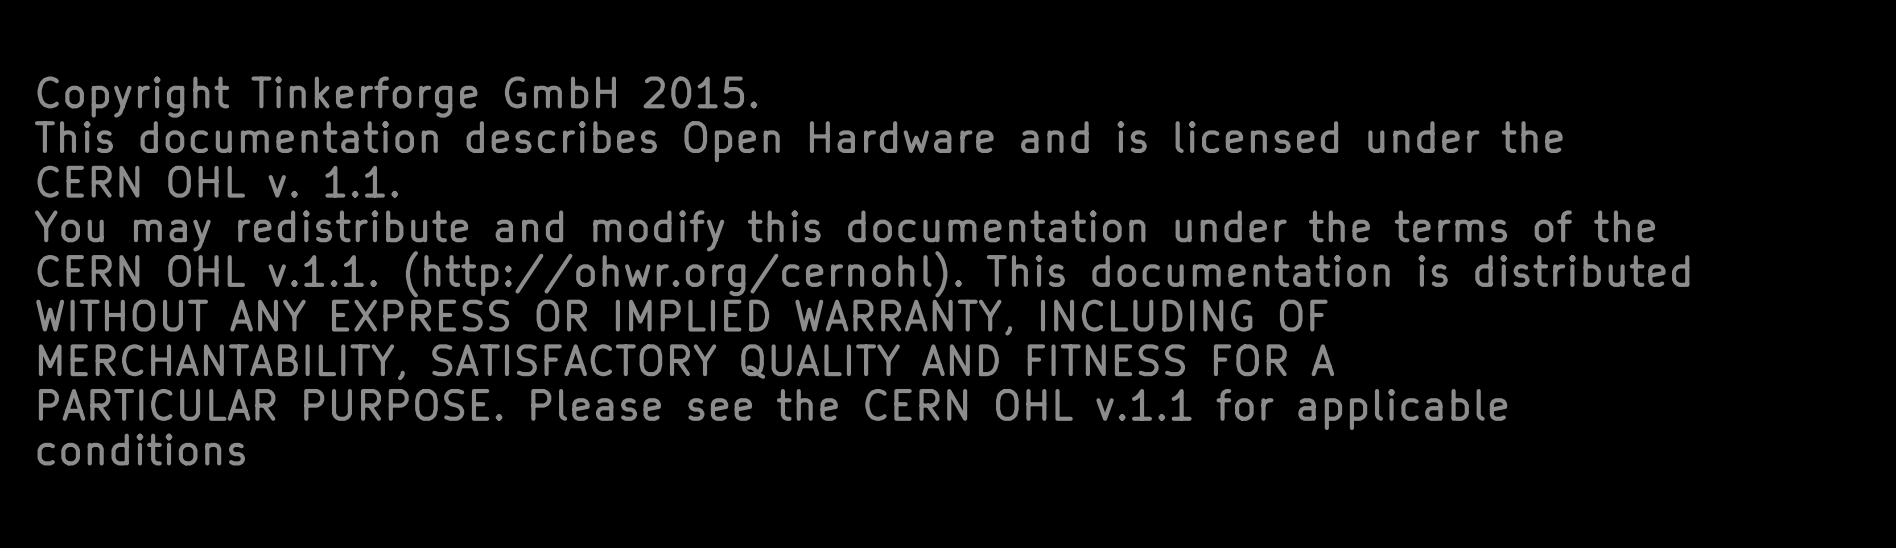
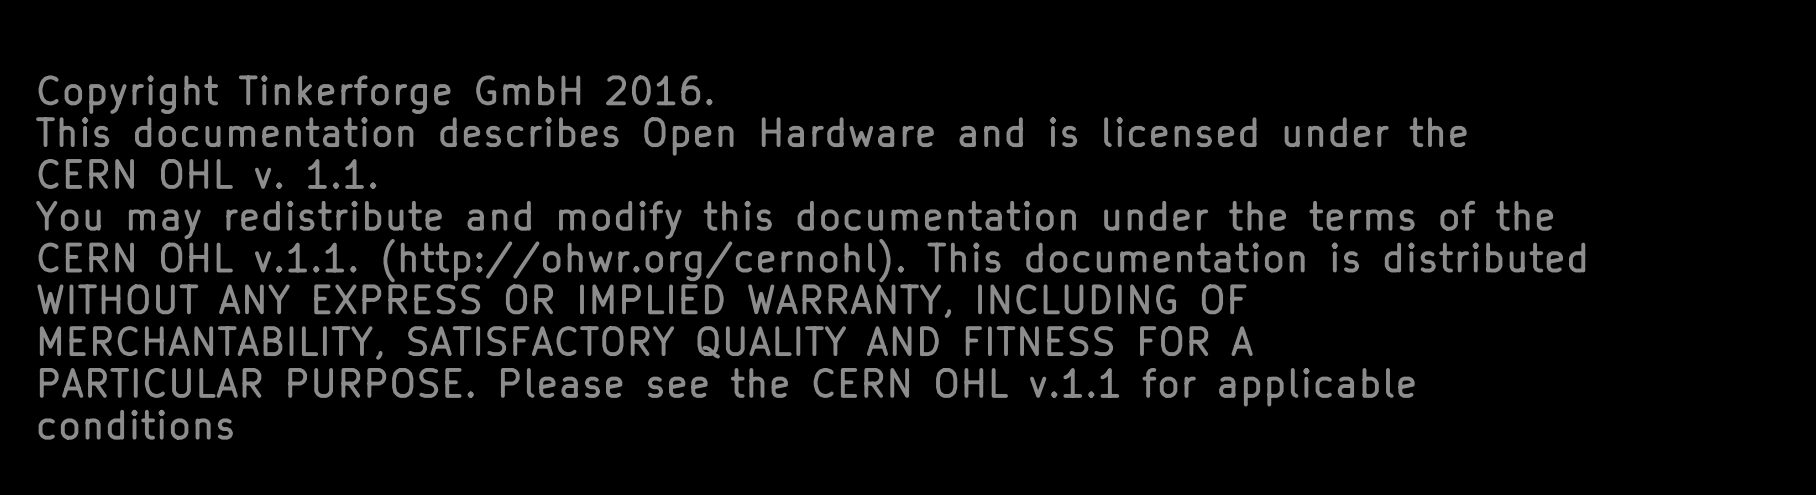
text: Copyright Tinkerforge GmbH 2015. (397, 97) -> Copyright Tinkerforge GmbH 2016. (375, 94)

